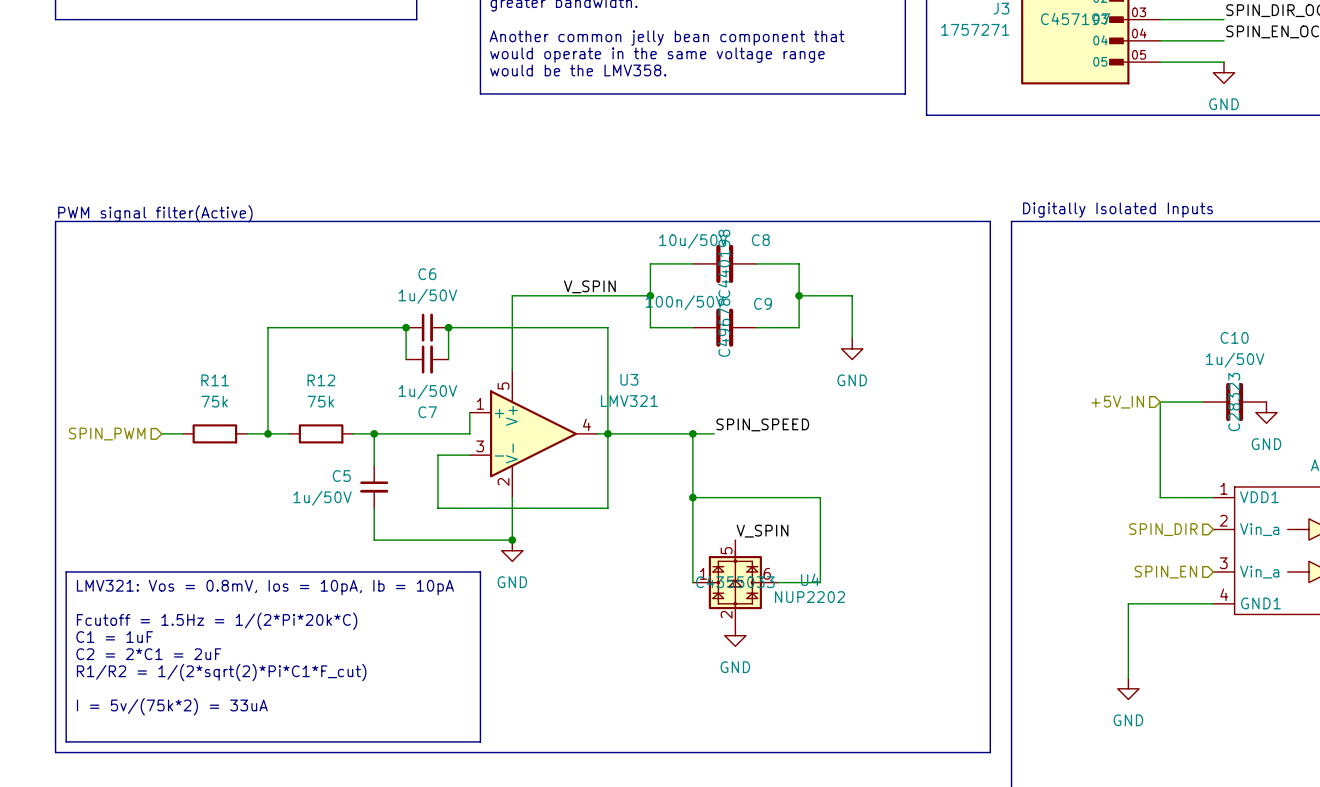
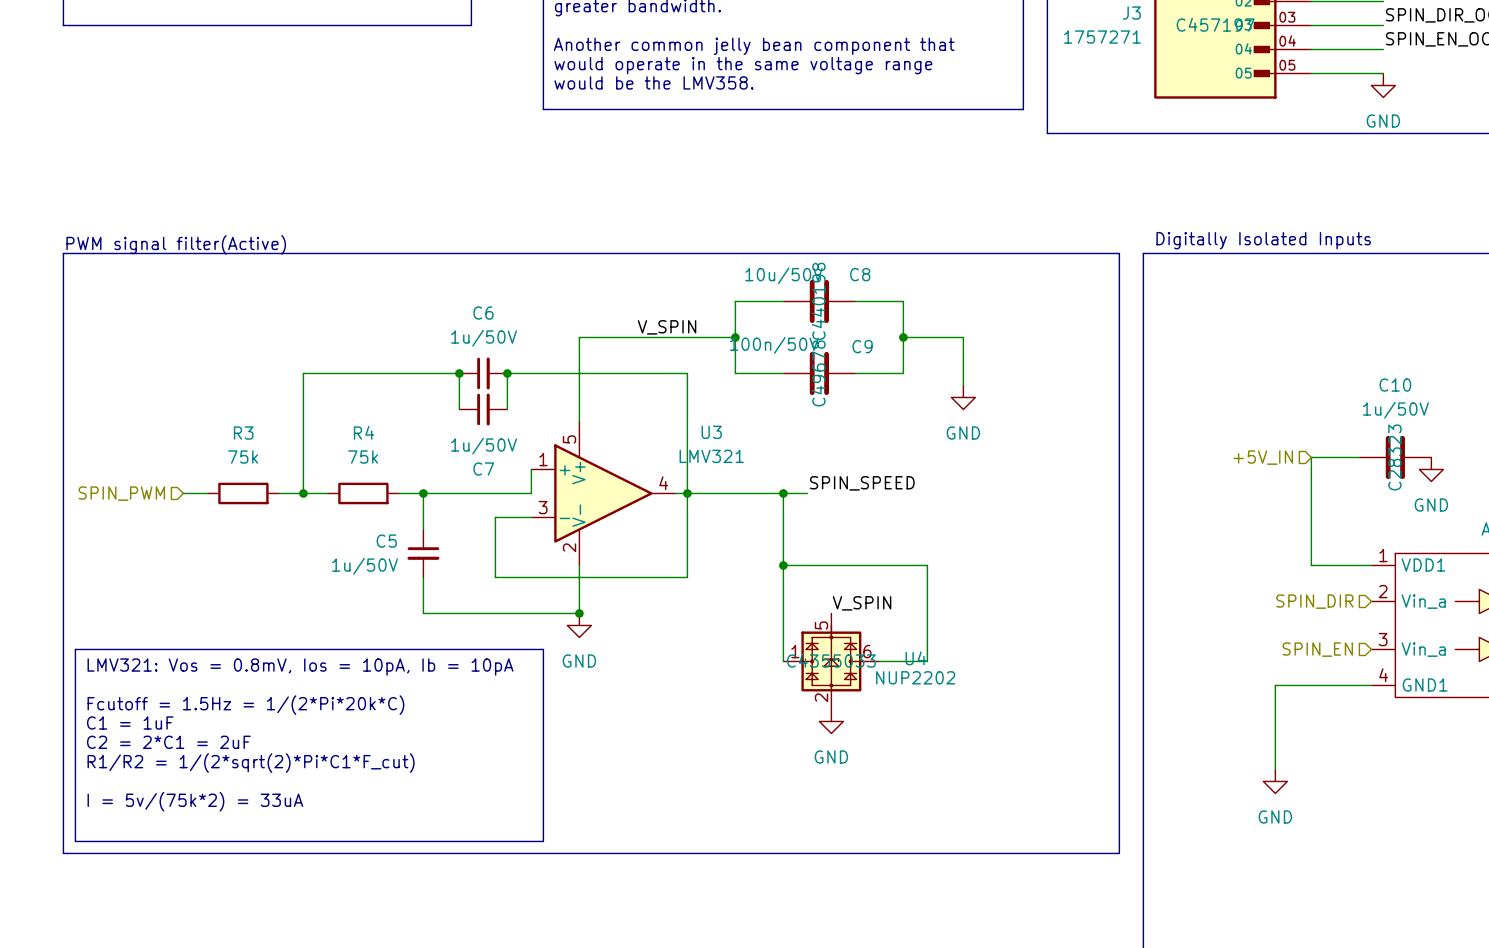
R11 name: R11 (215, 380) -> R3 (243, 433)
R12 name: R12 (321, 380) -> R4 (363, 432)

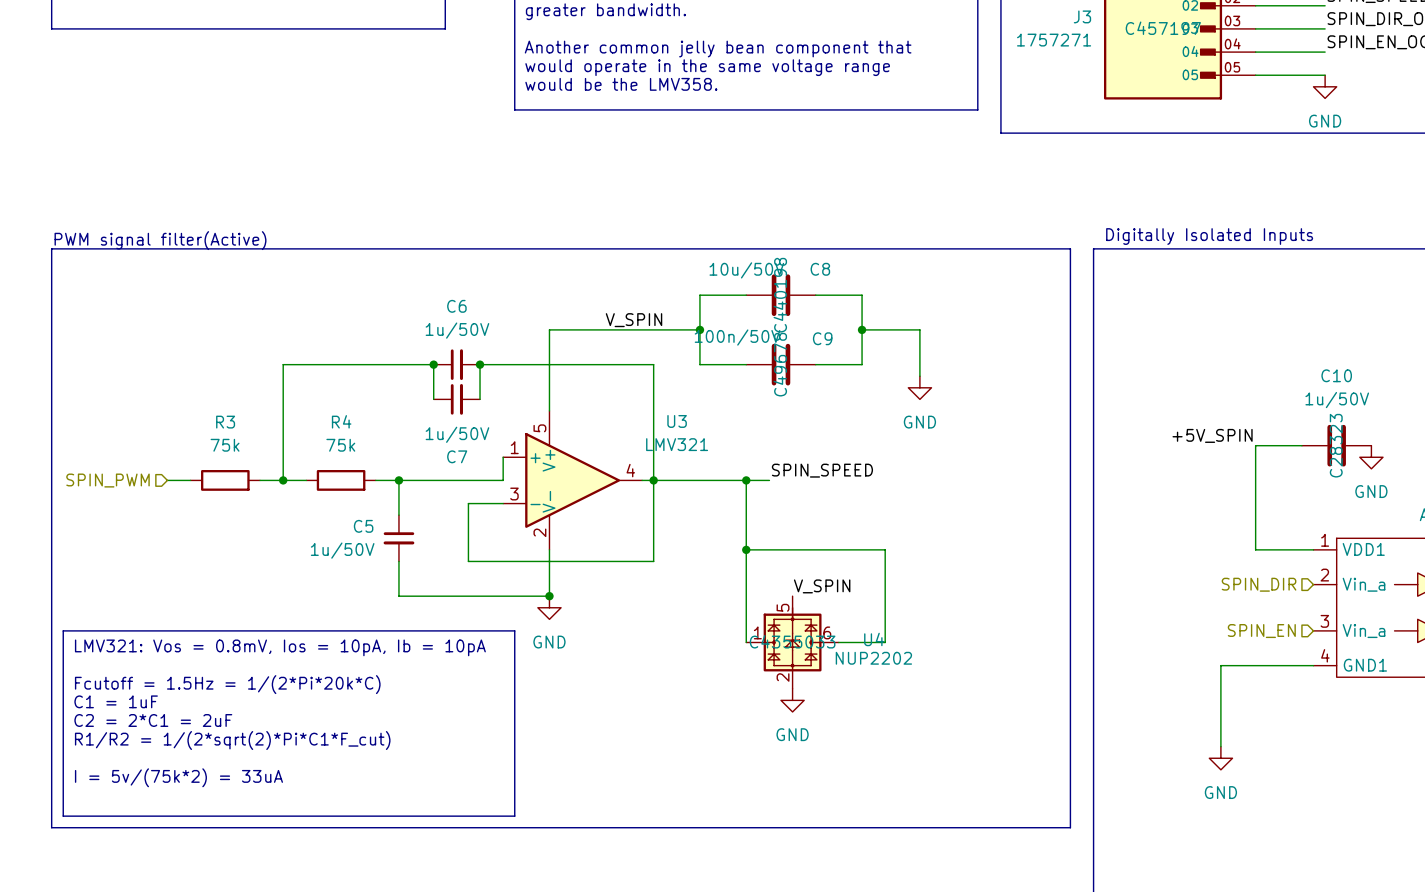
label: none -> +5V_SPIN (1212, 435)
hierarchical label: +5V_IN (1263, 457) -> none

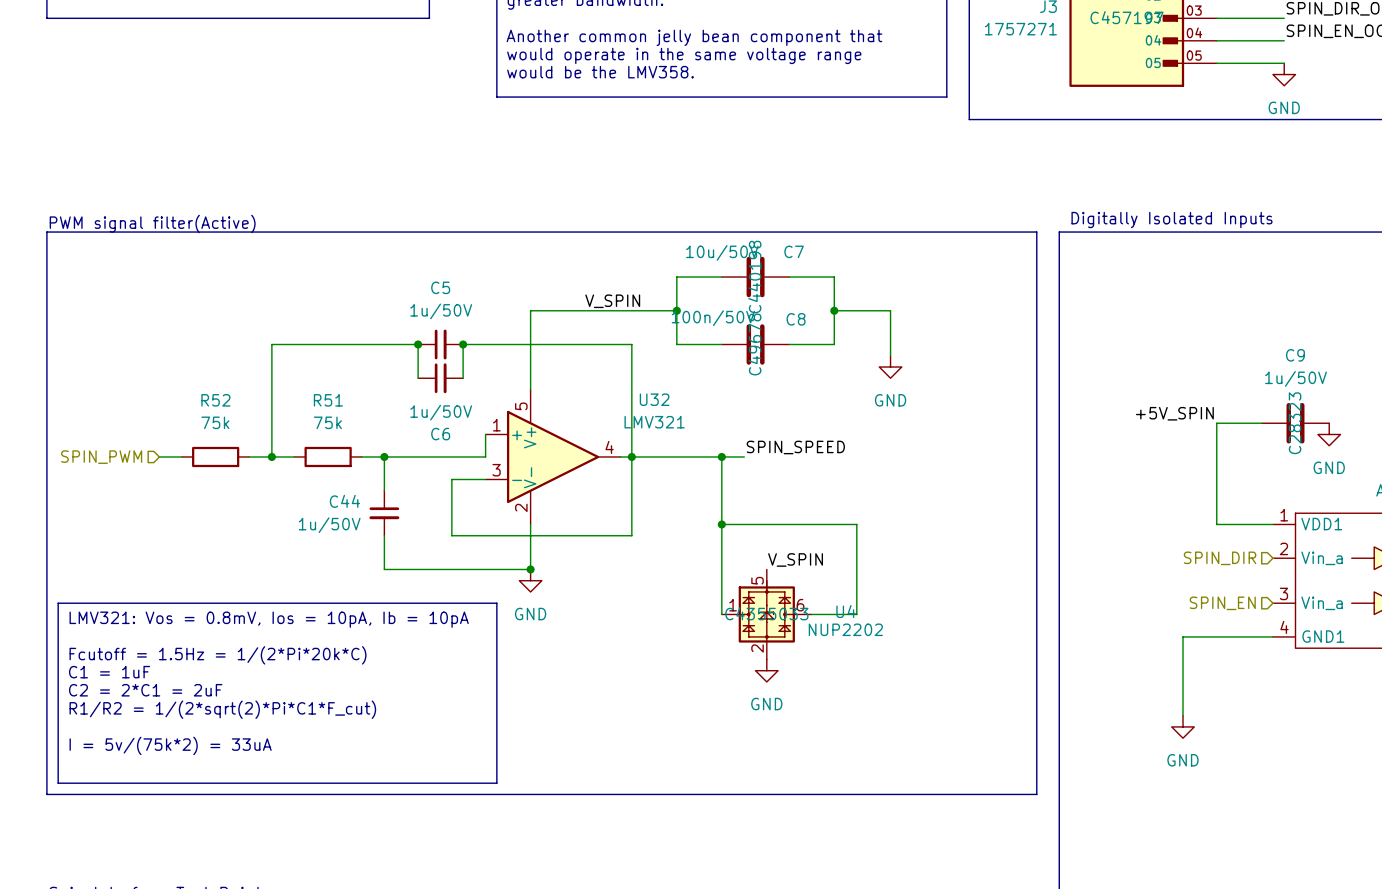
C8 name: C8 (820, 269) -> C7 (794, 251)
C6 name: C6 (456, 306) -> C5 (440, 287)
C9 name: C9 (822, 338) -> C8 (796, 319)
C10 name: C10 (1336, 375) -> C9 (1295, 355)
R4 name: R4 (341, 421) -> R51 (328, 400)
U3 name: U3 (677, 421) -> U32 (654, 399)
R3 name: R3 (225, 422) -> R52 (215, 400)
C7 name: C7 (457, 456) -> C6 (440, 434)
C5 name: C5 (363, 526) -> C44 (344, 501)

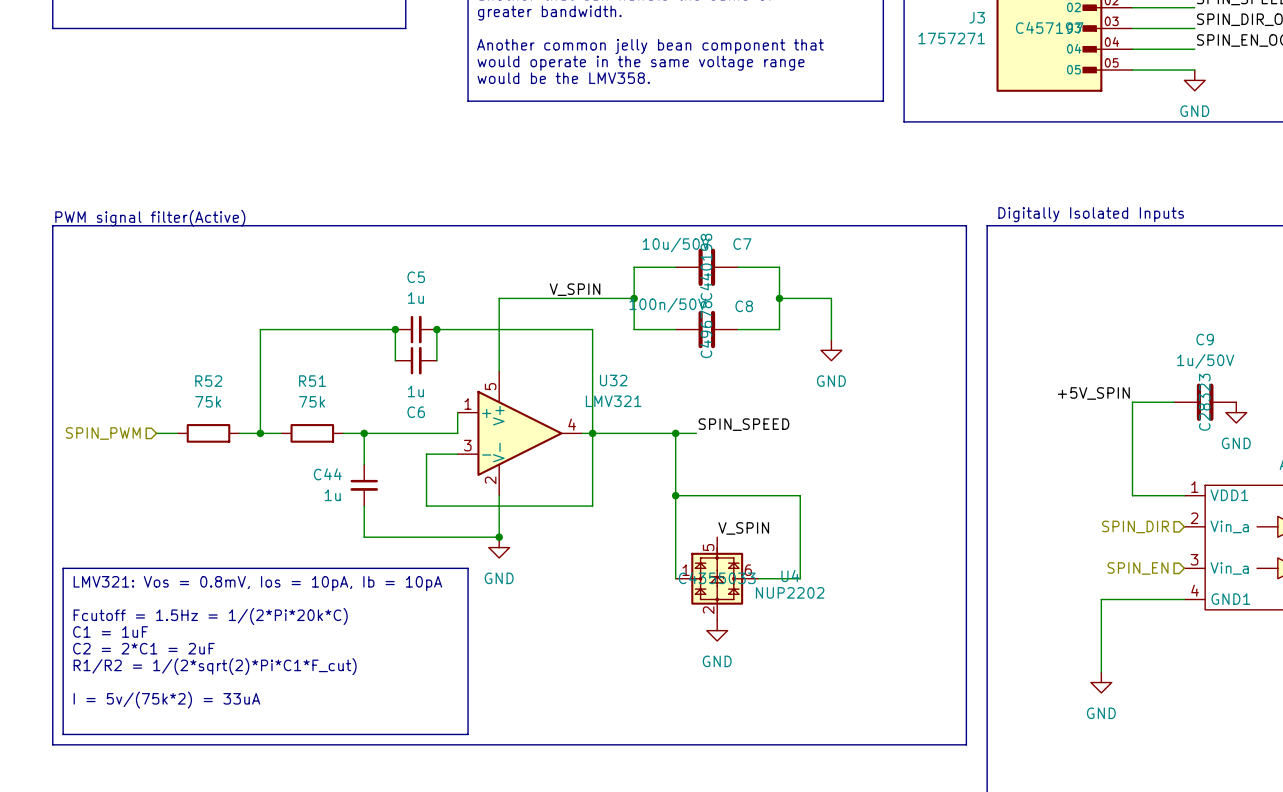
C5 value: 1u/50V (441, 311) -> 1u (415, 298)
C6 value: 1u/50V (441, 412) -> 1u (415, 391)
C44 value: 1u/50V (329, 525) -> 1u (332, 495)

